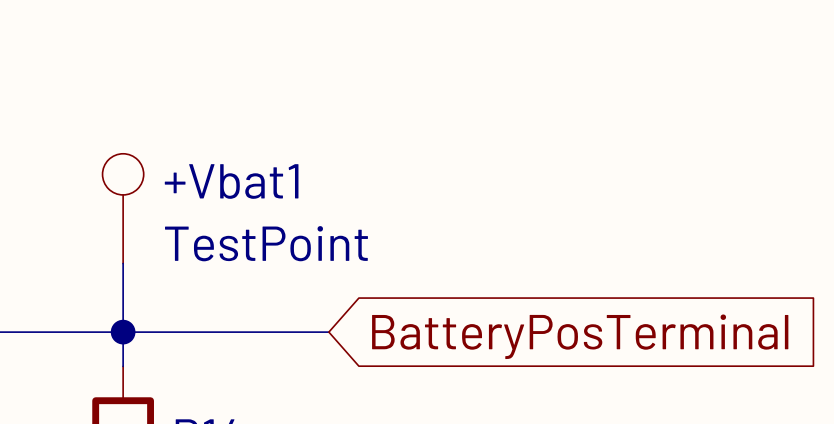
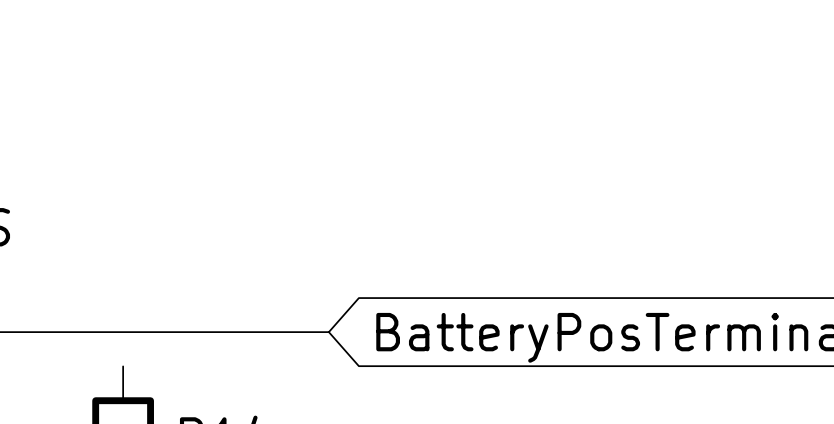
+Vbat1: TestPoint (123, 208) -> none
wire: (123, 263) (123, 366) -> none
junction: (123, 332) -> none

